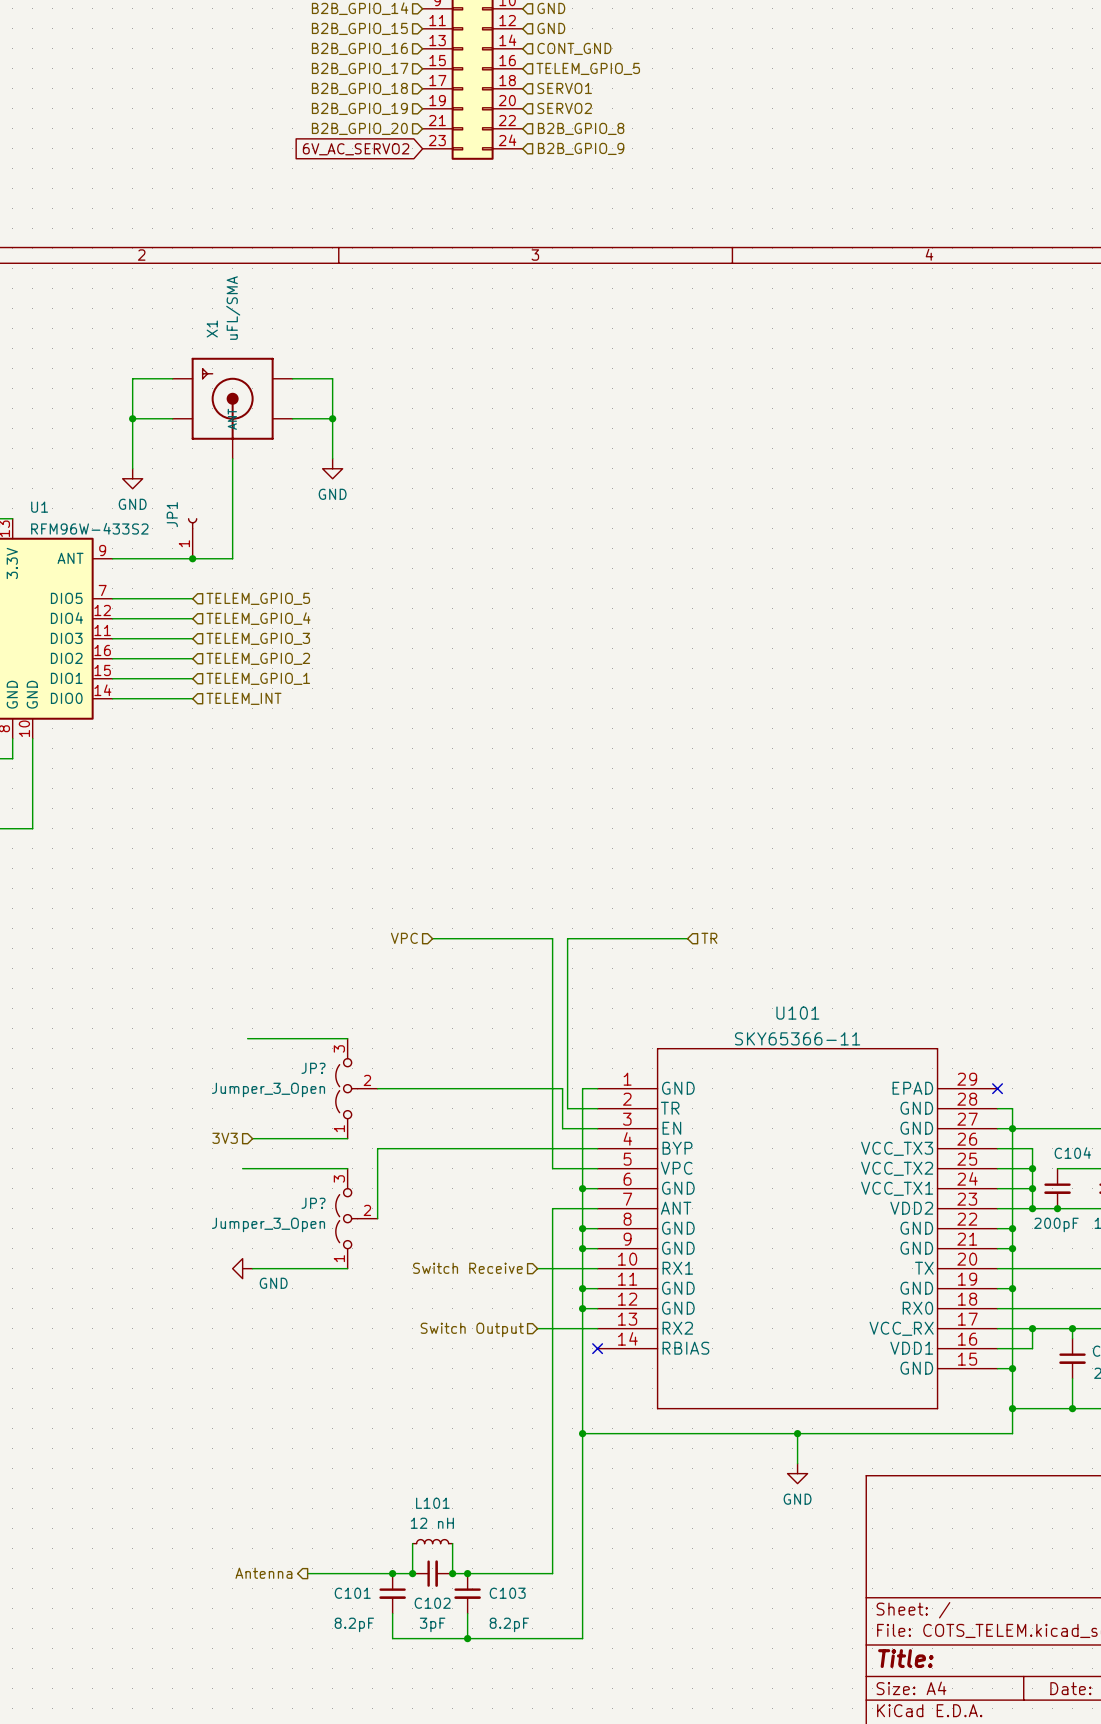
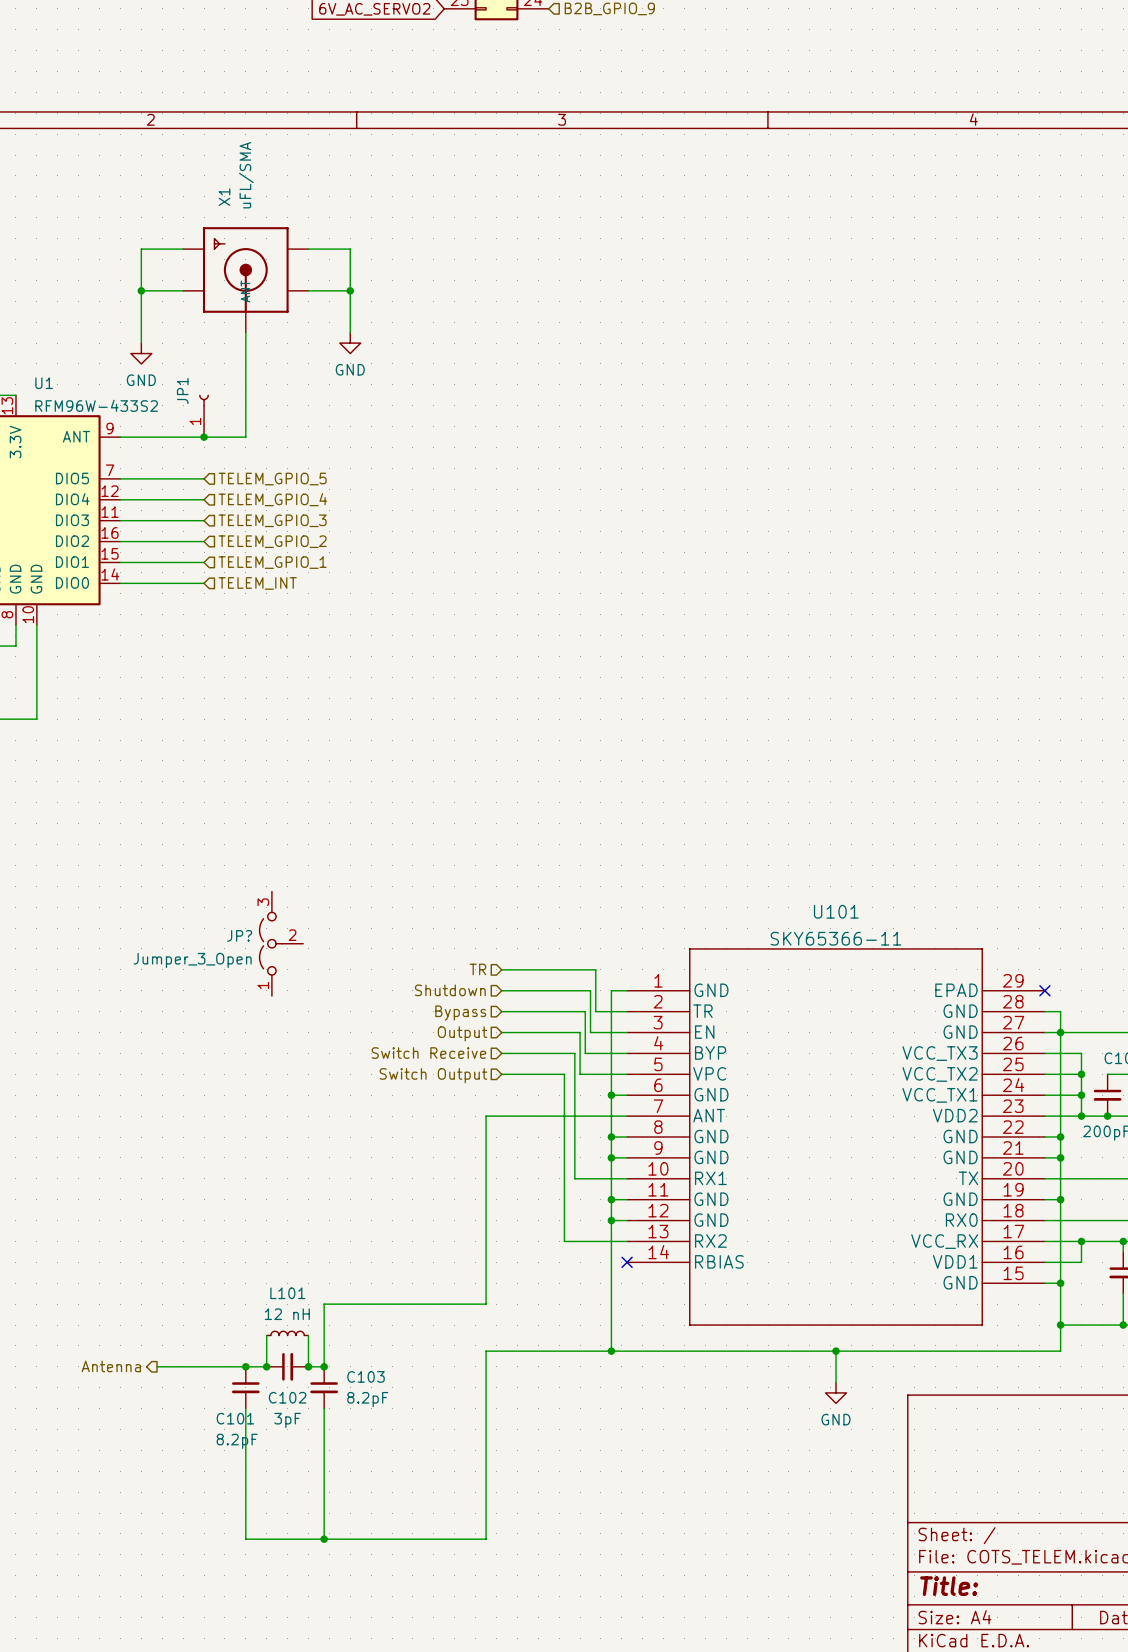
hierarchical label: VPC (404, 938) -> none
wire: (432, 938) (552, 938) (552, 1128) -> (501, 1032) (580, 1032)
wire: (687, 938) (567, 938) (567, 1068) -> (501, 969) (595, 969)
hierarchical label: TR (709, 938) -> none
wire: (247, 1038) (347, 1038) -> none
JP?: none -> Jumper_3_Open (281, 943)
hierarchical label: none -> TR (477, 969)
JP?: Jumper_3_Open (356, 1088) -> none
wire: (377, 1088) (477, 1088) -> none
hierarchical label: none -> Shutdown (450, 990)
hierarchical label: none -> Bypass (460, 1013)
hierarchical label: none -> Output (462, 1033)
hierarchical label: 3V3 (225, 1138) -> none
wire: (252, 1138) (347, 1138) -> none
wire: (477, 1148) (377, 1148) (377, 1218) -> none
wire: (547, 1148) (557, 1148) -> (501, 1011) (585, 1011) (585, 1053)
wire: (242, 1168) (347, 1168) -> none
wire: none -> (501, 1074) (564, 1074) (564, 1241)
wire: (552, 1208) (552, 1573) (452, 1573) (452, 1543) -> (580, 1116) (486, 1116) (486, 1304) (324, 1304) (324, 1366) (308, 1366) (308, 1335)
JP?: Jumper_3_Open (356, 1218) -> none
power symbol: GND (242, 1268) -> none
wire: (252, 1268) (347, 1268) -> none
hierarchical label position: Switch Receive (467, 1268) -> Switch Receive (428, 1053)
wire: (537, 1268) (547, 1268) -> (574, 1053) (574, 1178)
hierarchical label position: Switch Output (472, 1329) -> Switch Output (433, 1075)
wire: none -> (266, 1335) (266, 1366) (157, 1366)
wire: (582, 1433) (582, 1638) (392, 1638) (392, 1613) -> (611, 1351) (486, 1351) (486, 1539) (245, 1539) (245, 1408)
hierarchical label: none -> Antenna (111, 1366)
junction: none -> (245, 1366)
junction: none -> (266, 1366)
junction: none -> (308, 1366)
junction: none -> (324, 1366)
wire: none -> (324, 1408) (324, 1539)
L101 position: (432, 1541) -> (287, 1333)
wire: (412, 1543) (412, 1573) (307, 1573) -> none
hierarchical label: Antenna (263, 1573) -> none
junction: (392, 1573) -> none
junction: (412, 1573) -> none
C102 position: (432, 1573) -> (287, 1366)
junction: (452, 1573) -> none
junction: (467, 1573) -> none
C101 name position: C101 (352, 1593) -> C101 (235, 1418)
C101 position: (392, 1593) -> (245, 1387)
C103 position: (467, 1593) -> (324, 1387)
C103 name position: C103 (507, 1593) -> C103 (366, 1376)
junction: none -> (324, 1539)
wire: (467, 1613) (467, 1638) -> none
C101 value position: 8.2pF (354, 1624) -> 8.2pF (237, 1441)
C103 value position: 8.2pF (509, 1624) -> 8.2pF (367, 1399)
junction: (467, 1638) -> none

